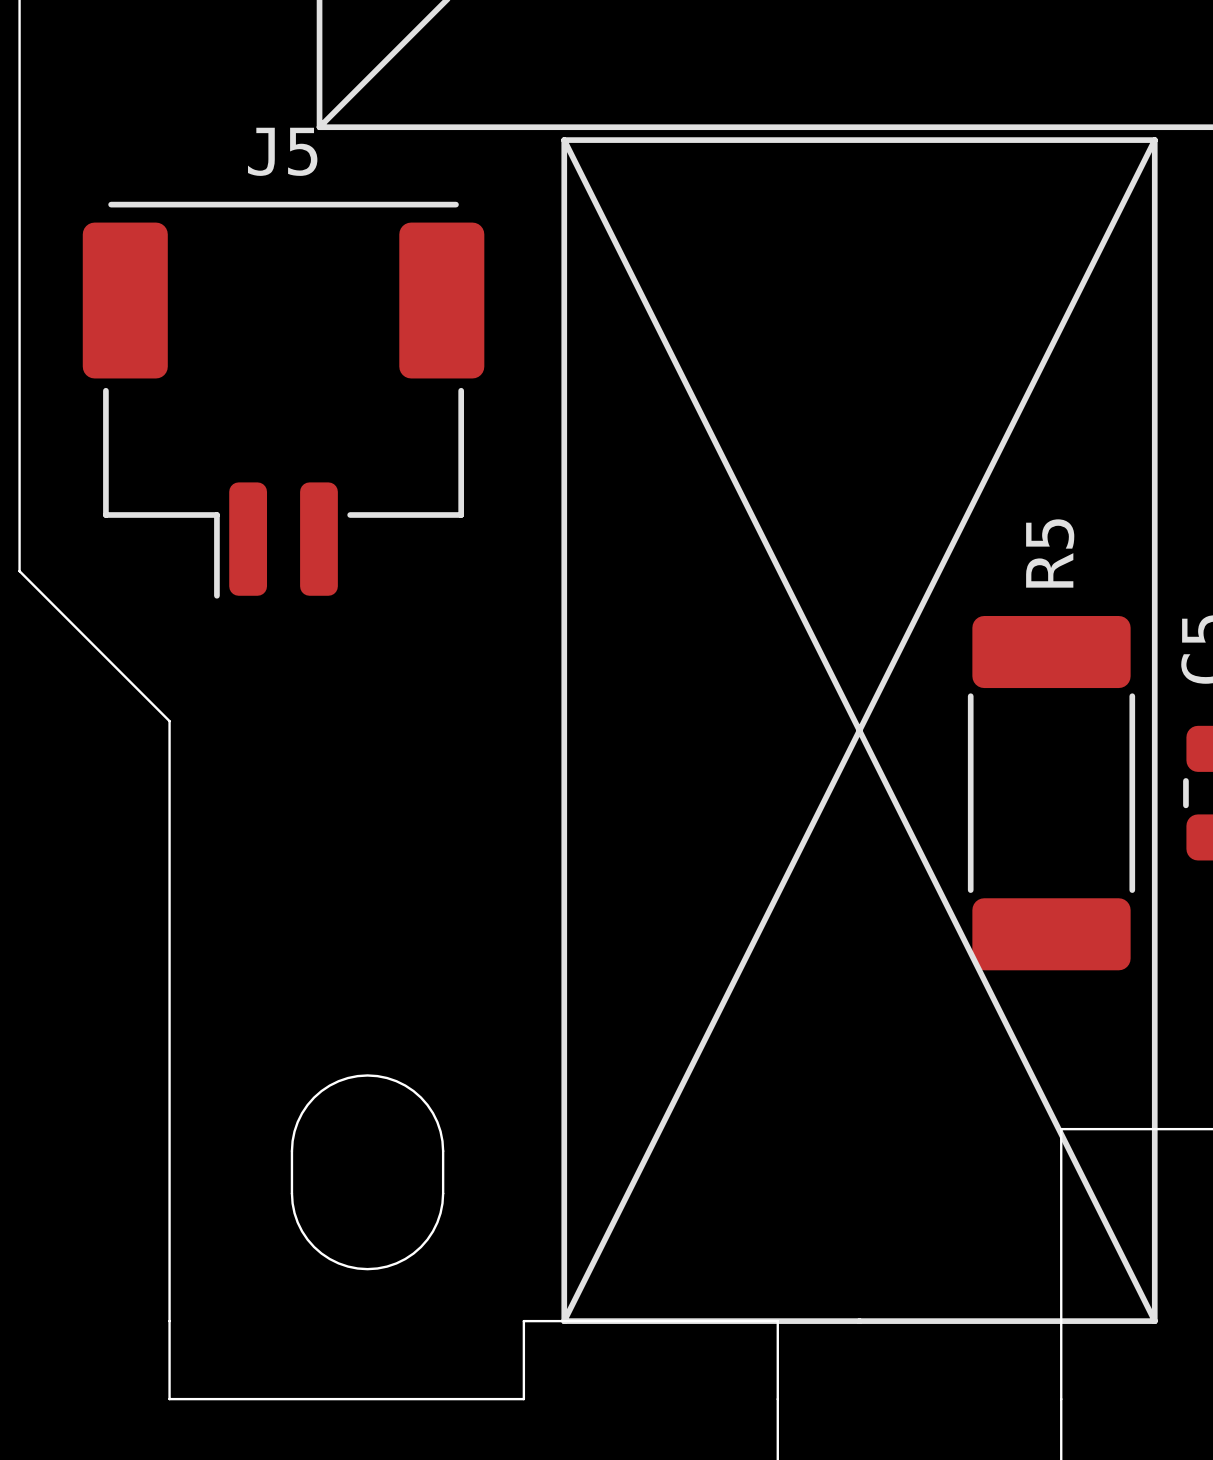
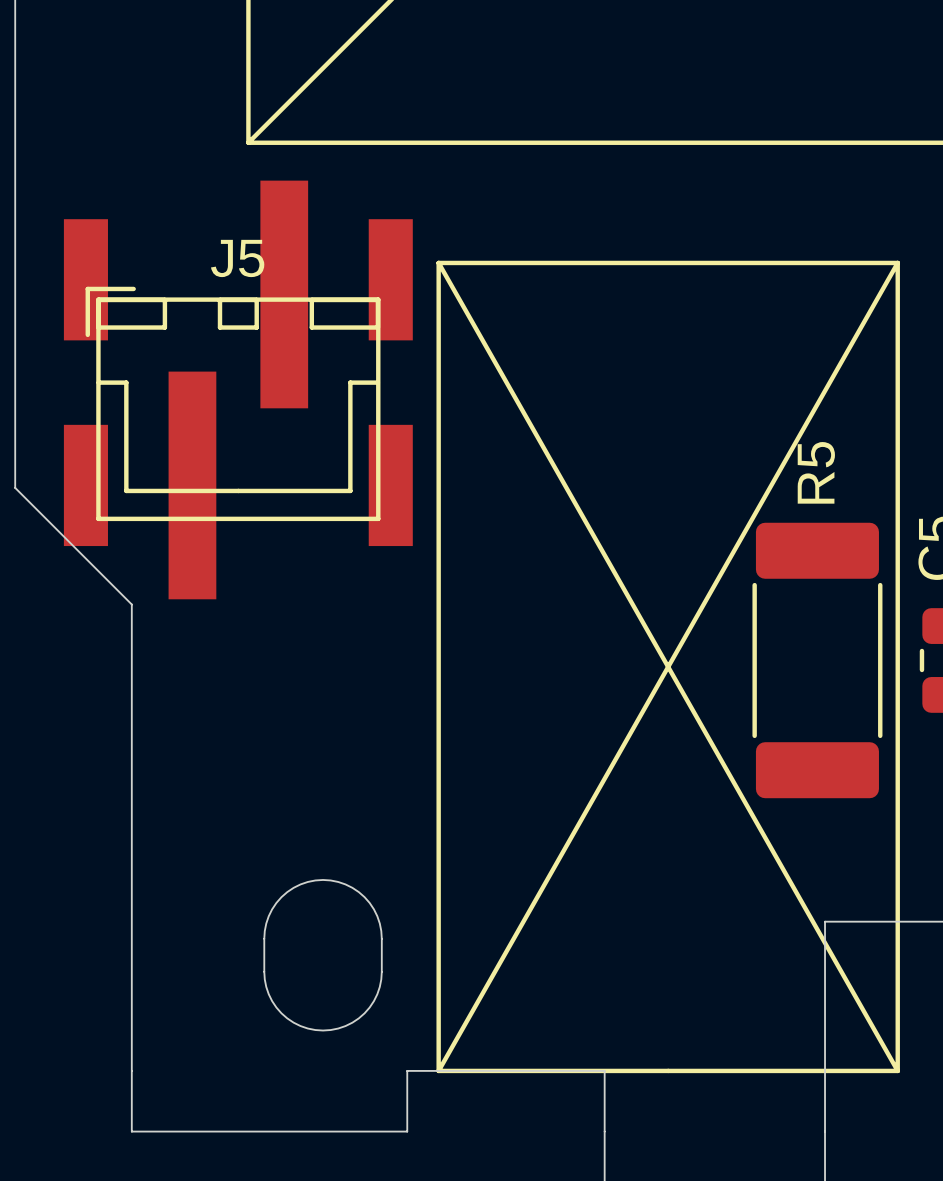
line: (564, 140) (1154, 1321) -> (438, 1070) (897, 262) (438, 262) (897, 1070)
line: (564, 140) (1154, 140) -> none
line: (564, 140) (564, 281) -> none
line: (1154, 140) (1154, 281) -> none
line: (1154, 140) (564, 1321) -> none
J5 footprint: [82, 201, 485, 599] -> [63, 180, 413, 600]
board edge: (291, 1151) (292, 1203) (297, 1222) (314, 1247) (329, 1259) (357, 1268) (387, 1266) (413, 1253) (433, 1231) (442, 1203) (442, 1141) (437, 1122) (427, 1105) (405, 1085) (387, 1078) (367, 1075) (347, 1078) (329, 1085) (314, 1097) (302, 1113) (294, 1131) (291, 1151) -> (264, 938) (264, 979) (268, 994) (281, 1013) (293, 1022) (315, 1030) (338, 1028) (358, 1018) (373, 1001) (381, 979) (381, 931) (373, 909) (364, 897) (352, 887) (338, 881) (323, 879) (307, 881) (293, 887) (281, 897) (272, 909) (266, 923) (264, 938)

